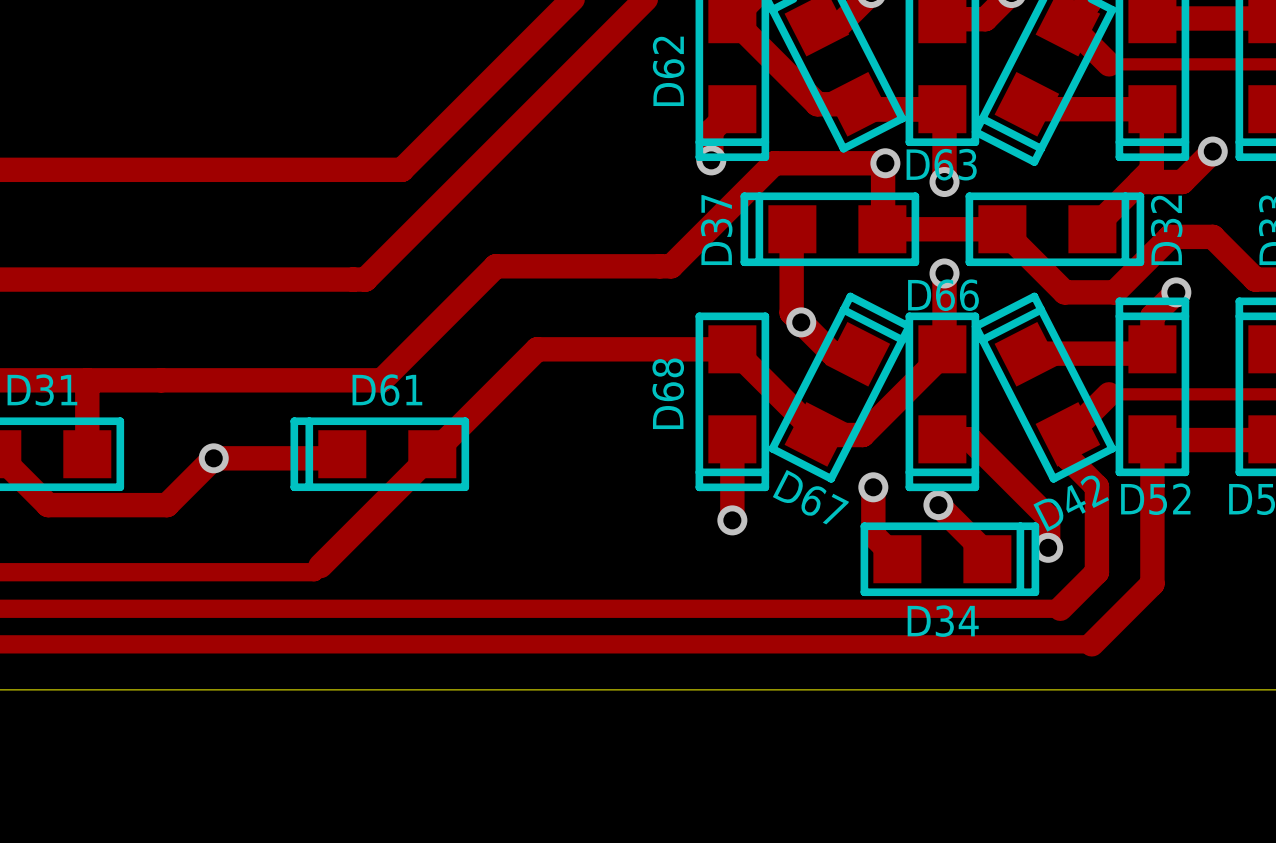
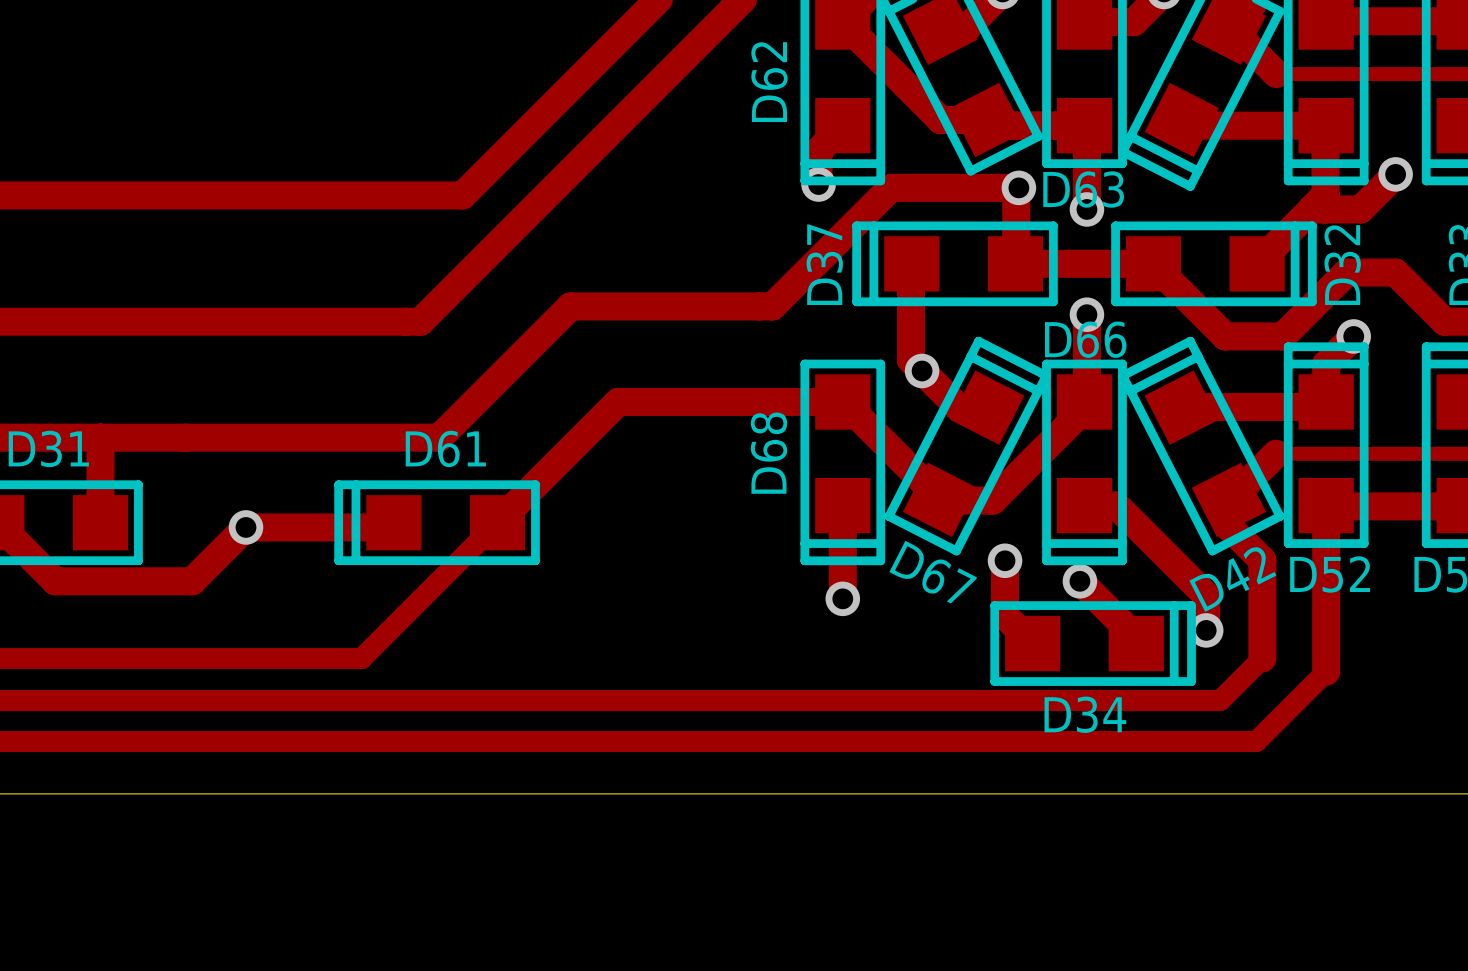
track width: thick (432, 454) (320, 566) -> thin (497, 522) (368, 651)
track width: thick (1096, 572) (1060, 608) -> thin (1262, 658) (1220, 700)
track width: thick (1152, 583) (1091, 644) -> thin (1326, 671) (1256, 741)

